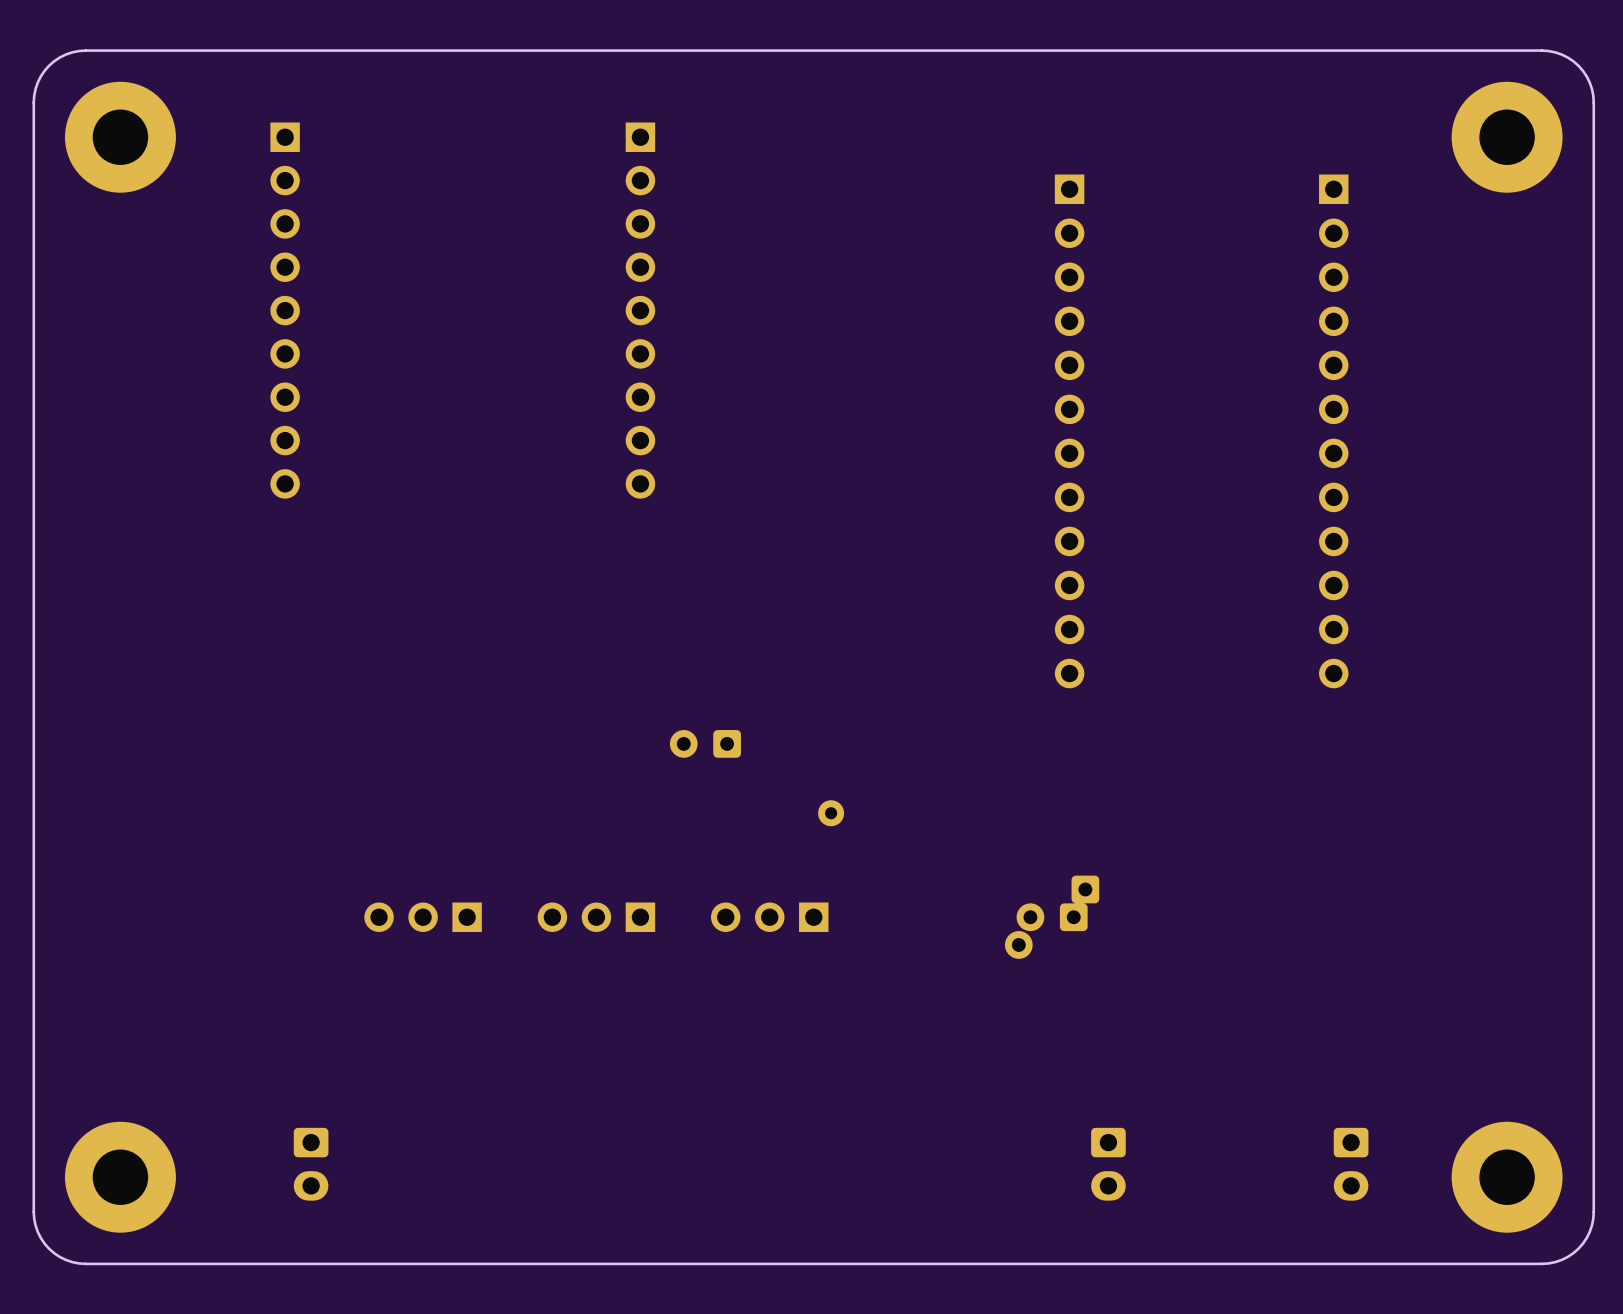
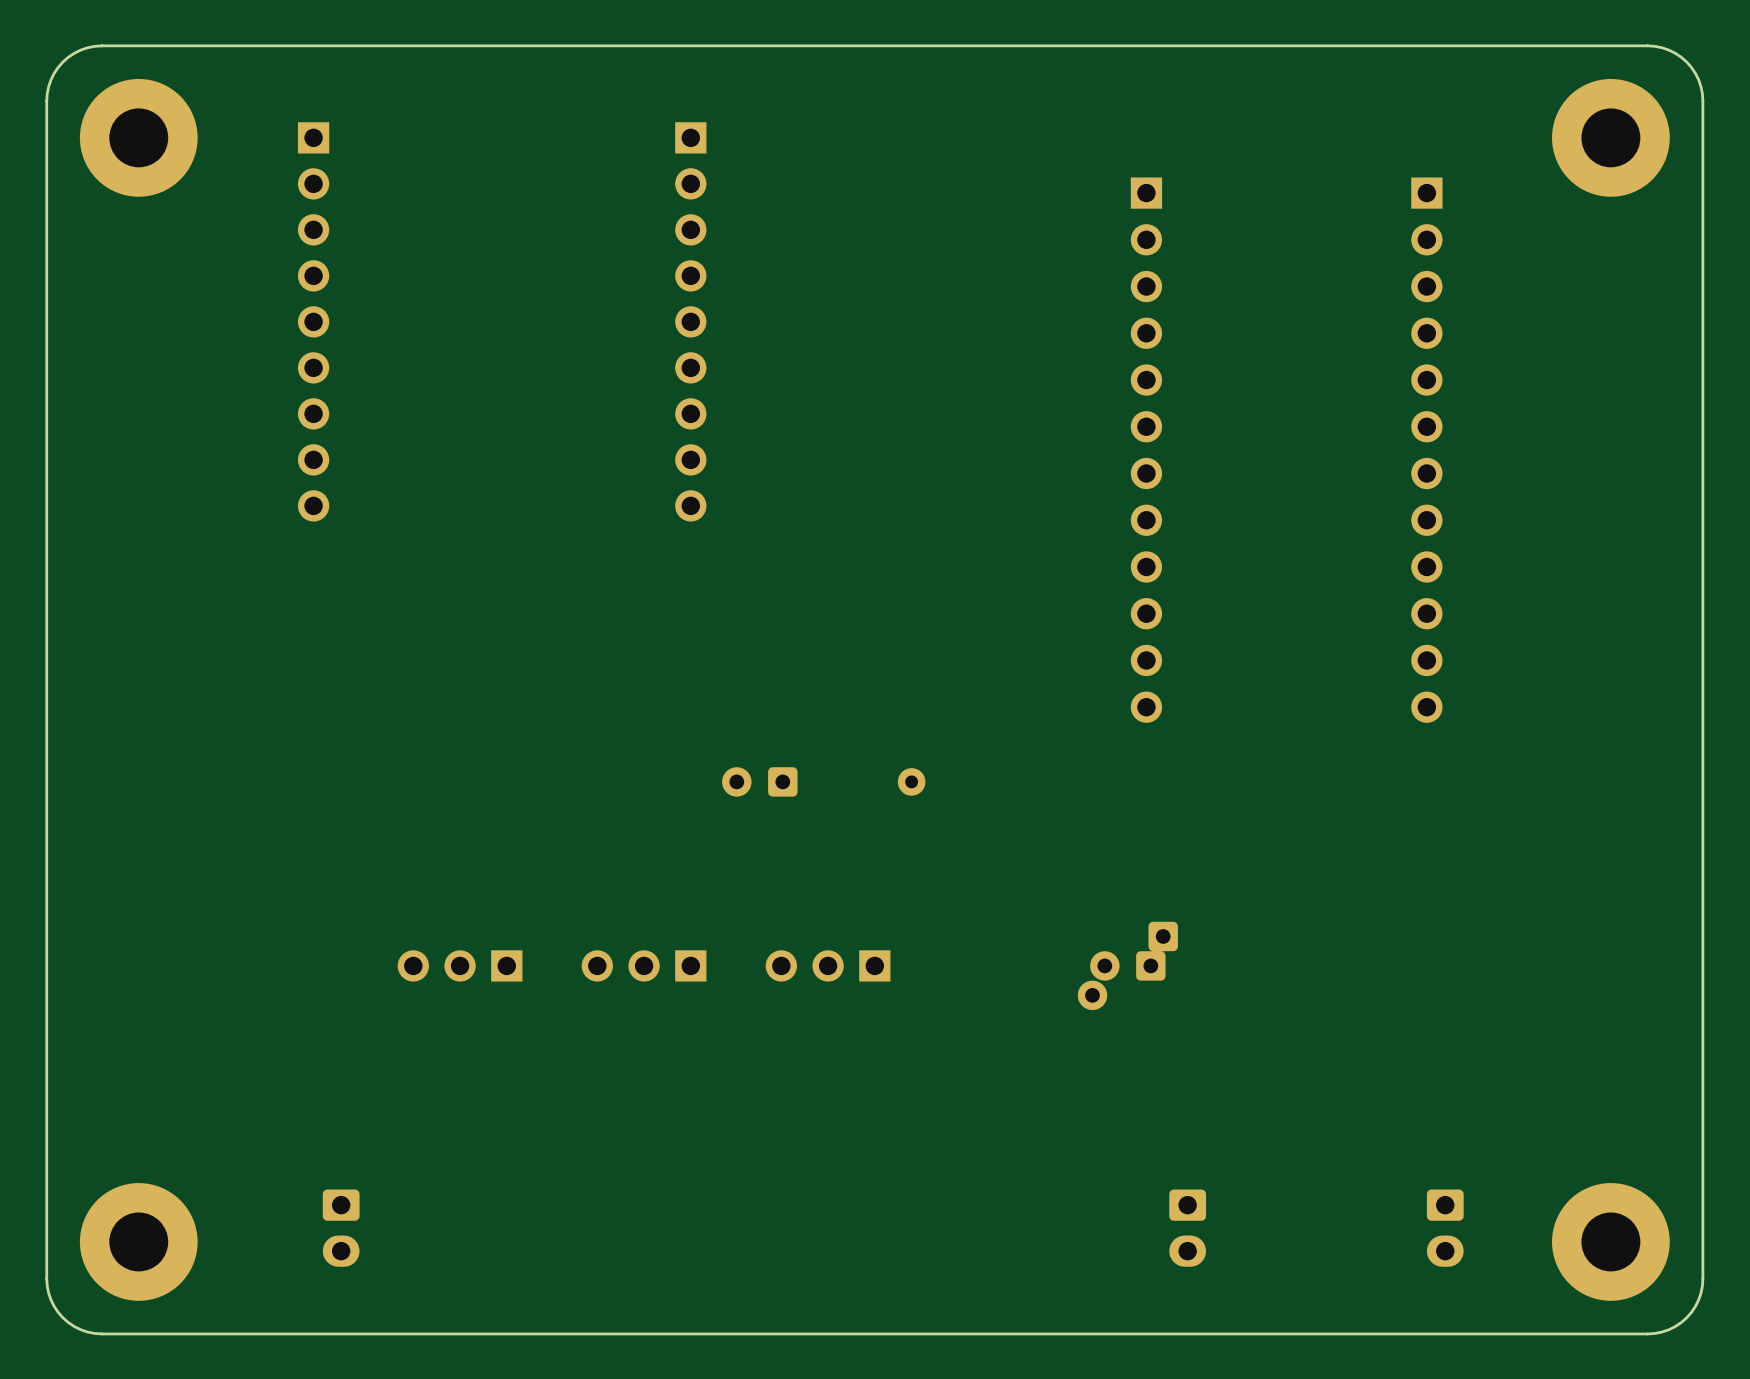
part position: (831, 813) -> (911, 781)

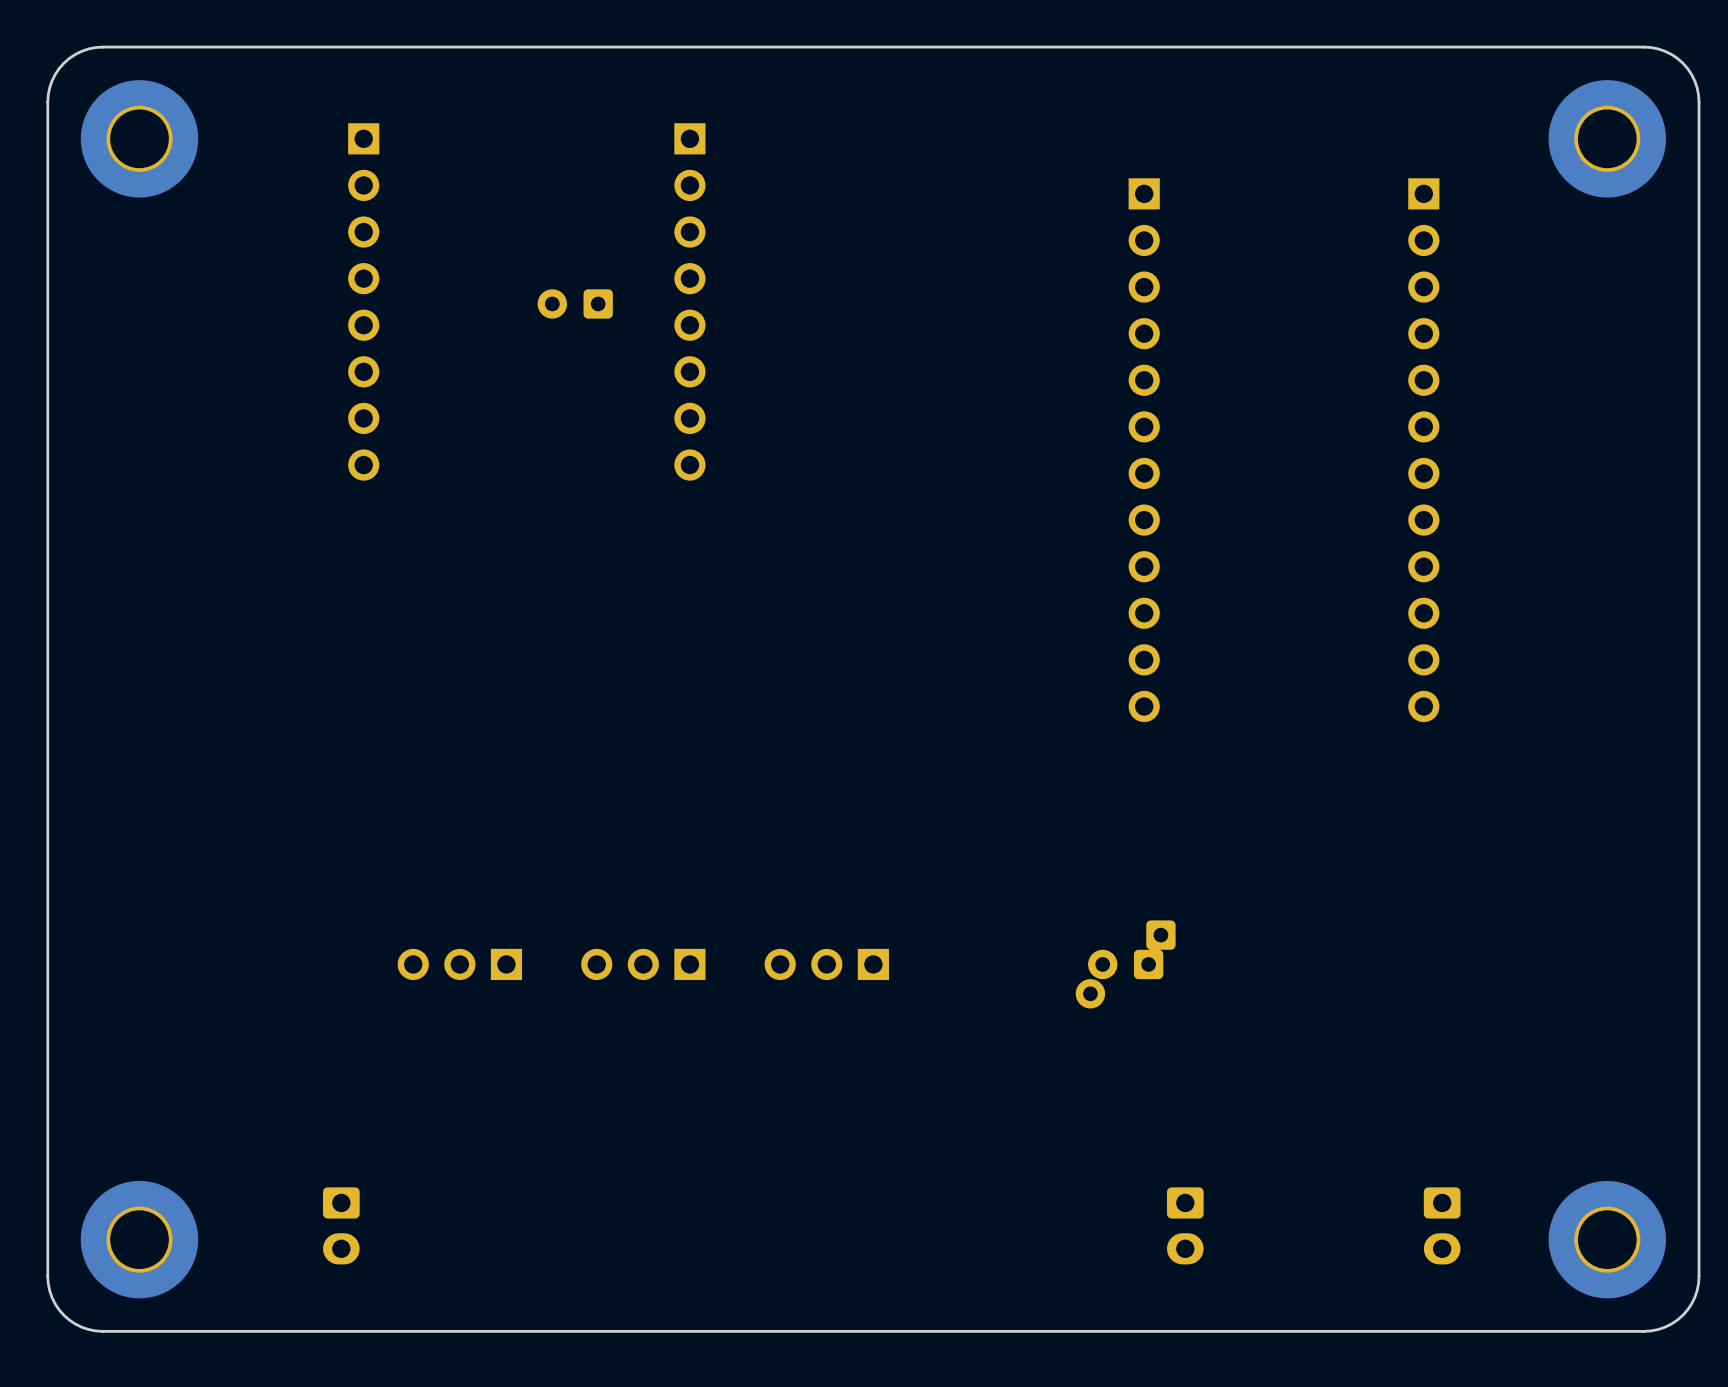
part: none -> (363, 301)
part: none -> (689, 301)
part: none -> (575, 303)
part: (313, 321) -> none
part: (690, 321) -> none
part: (759, 781) -> none
part: (911, 781) -> none

